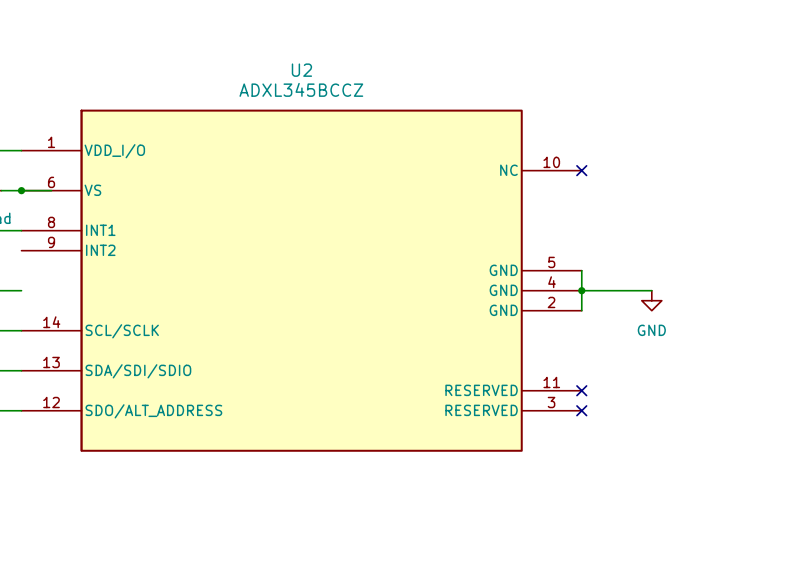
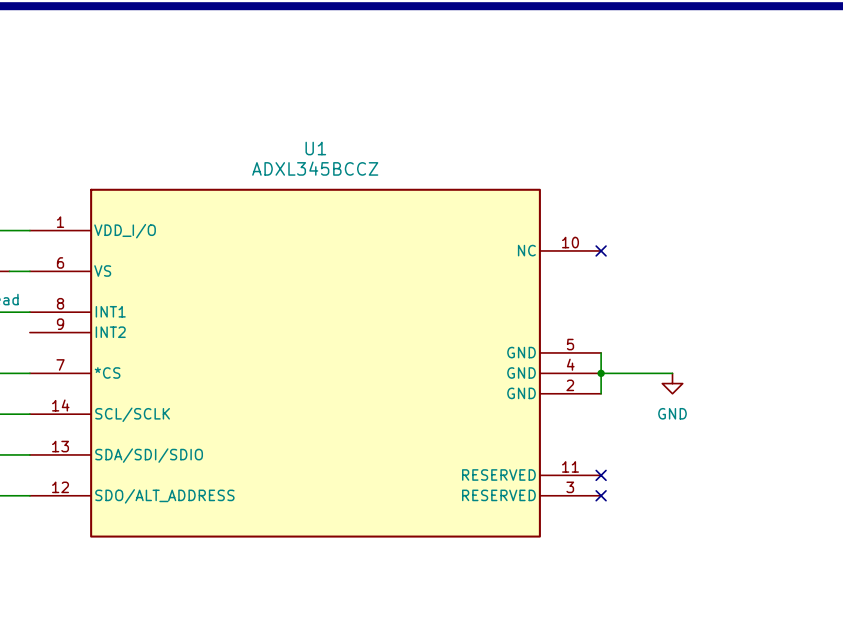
junction: (21, 190) -> none
U2: ADXL345BCCZ (301, 280) -> none
U1: none -> ADXL345BCCZ (315, 363)

